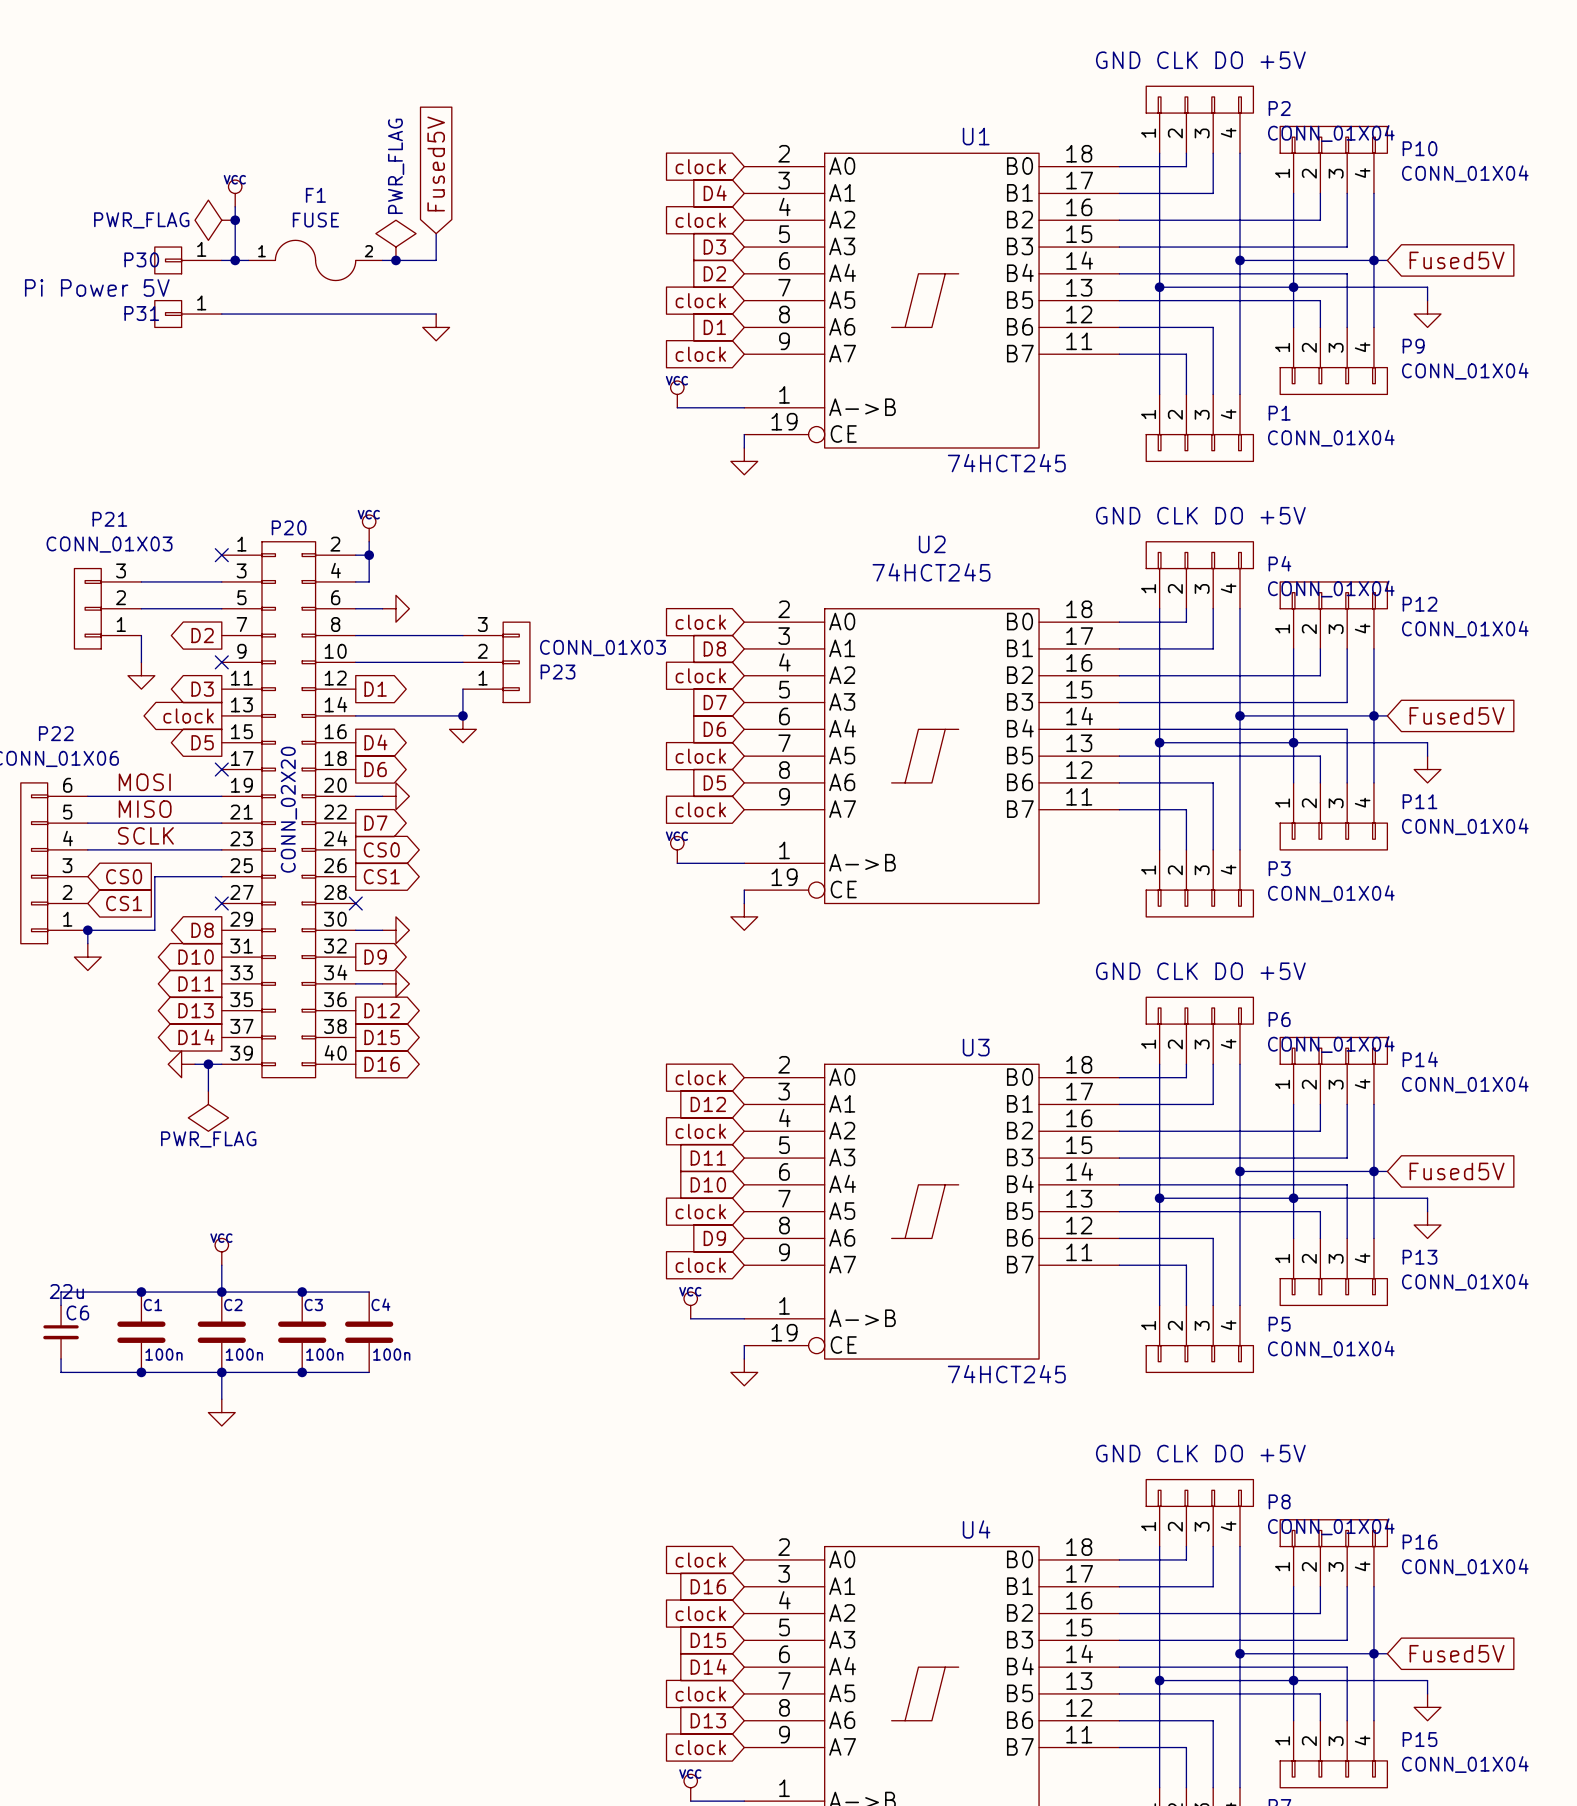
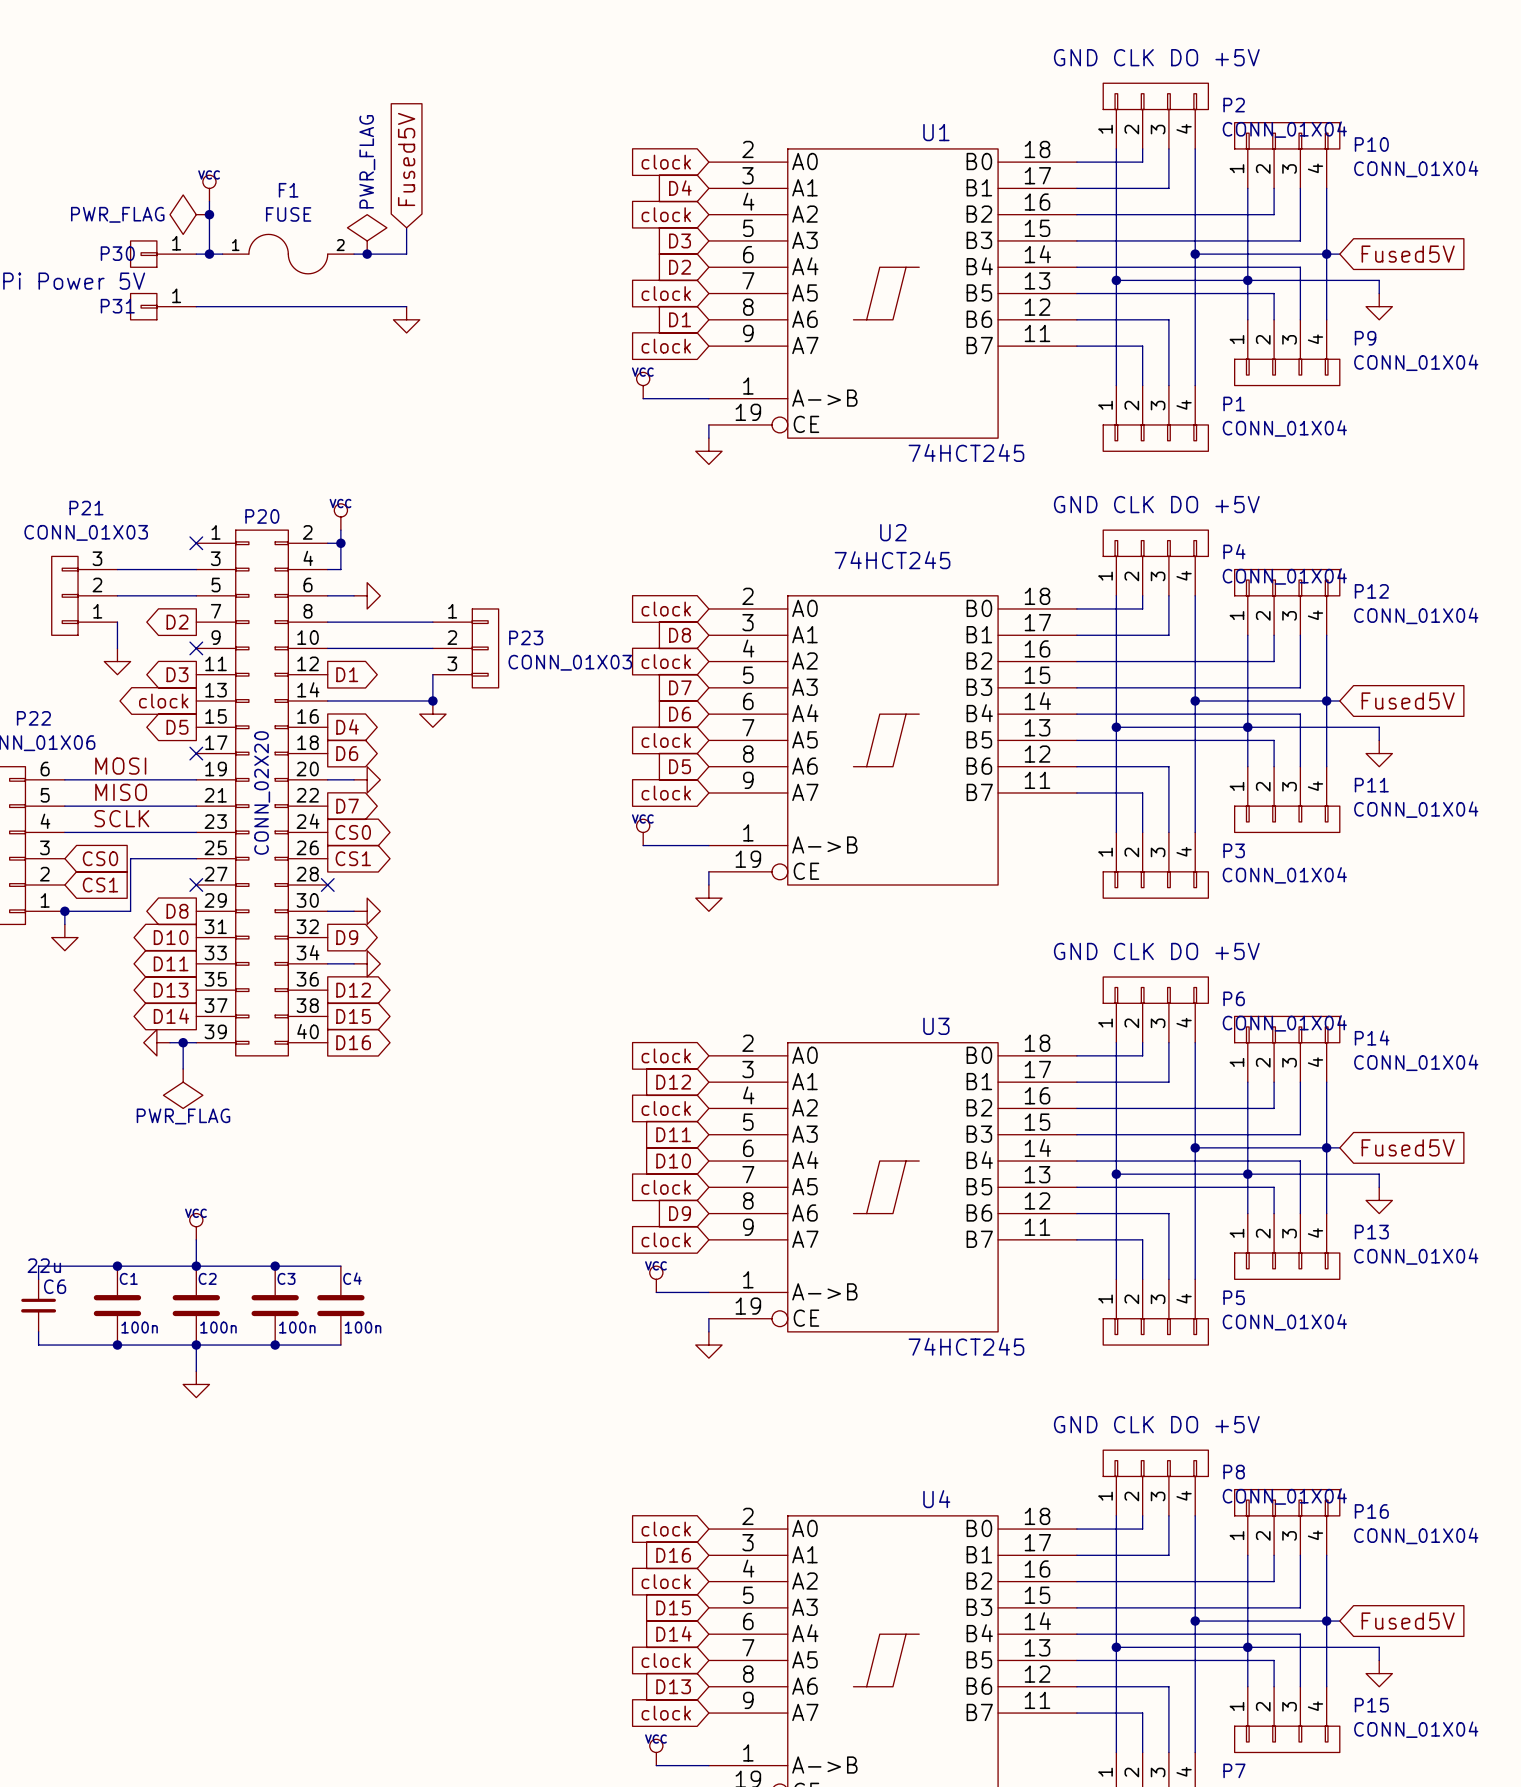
P23 flip: as is (516, 662) -> up-down (485, 648)

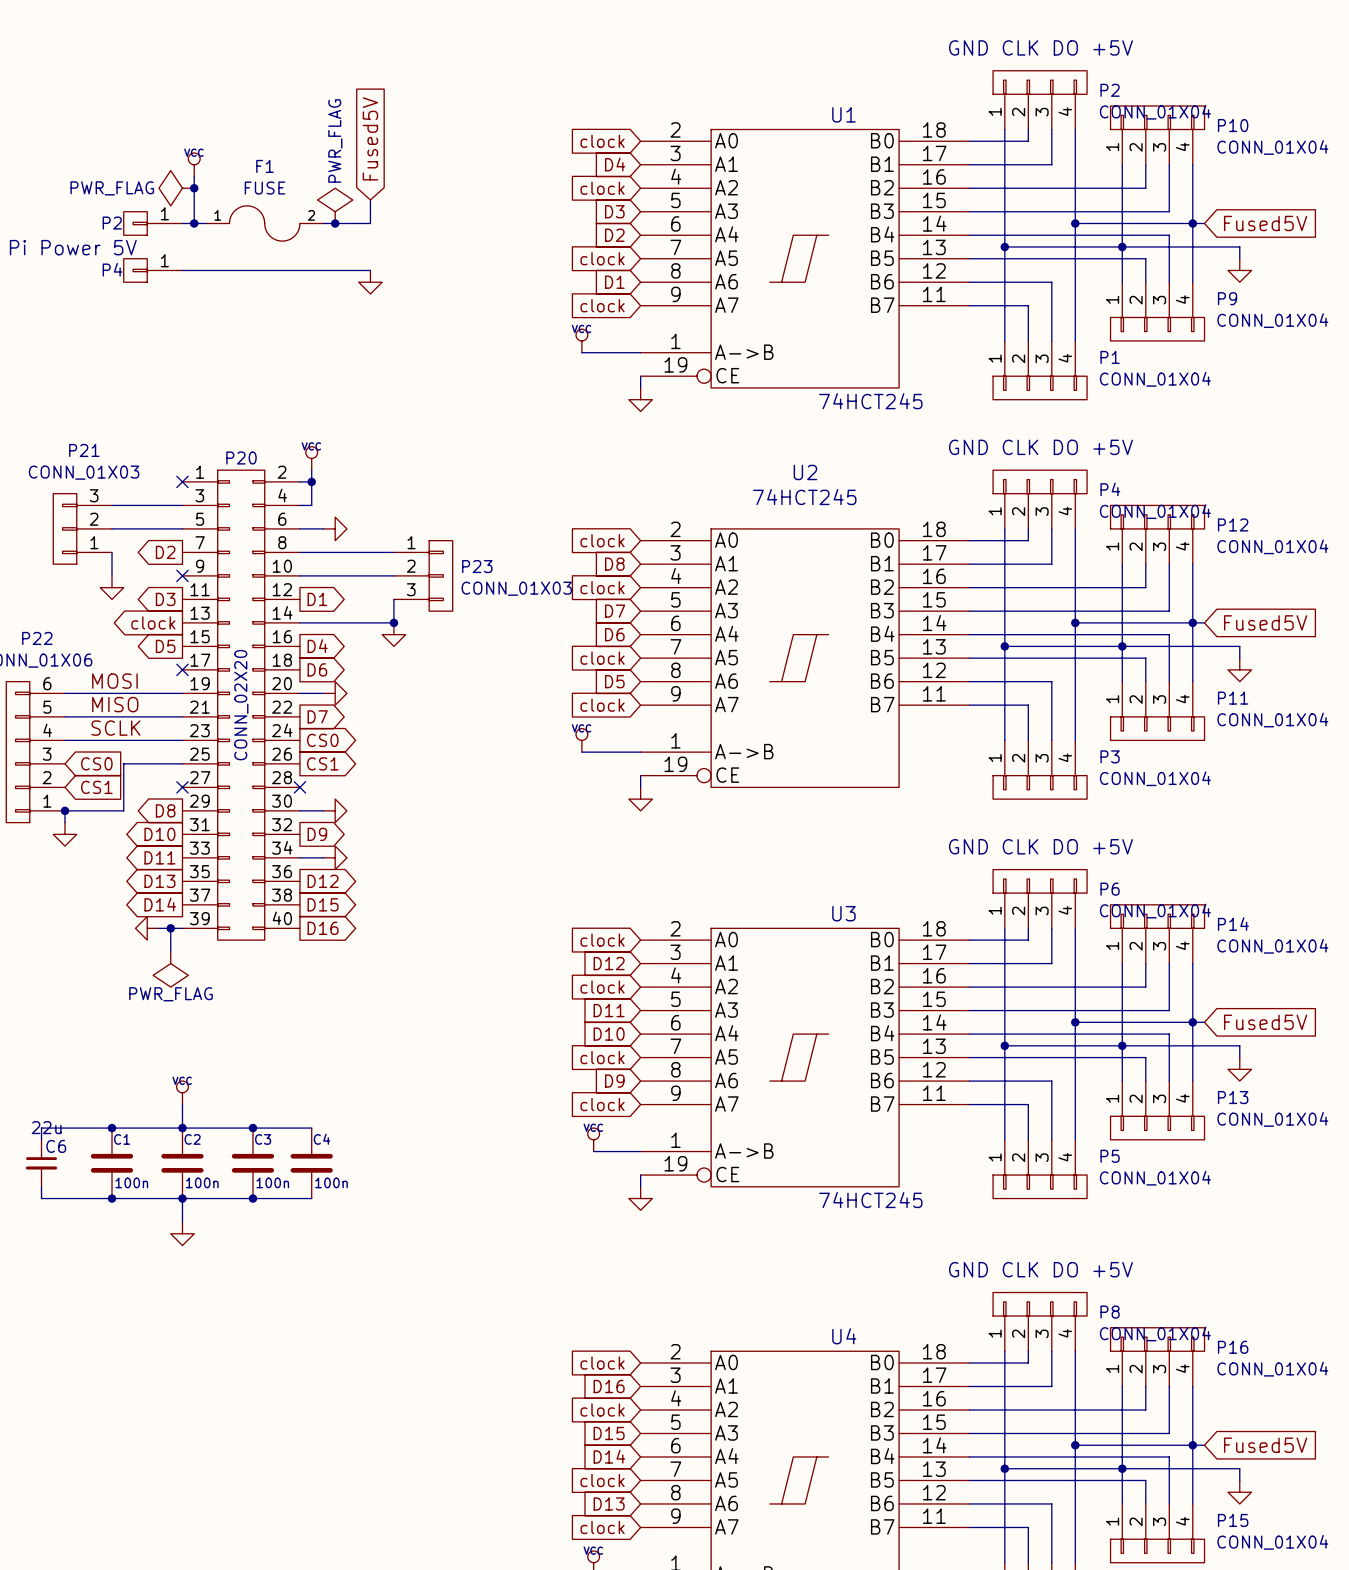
P30 name: P30 (117, 253) -> P2 (112, 223)
P31 name: P31 (117, 306) -> P4 (112, 269)

